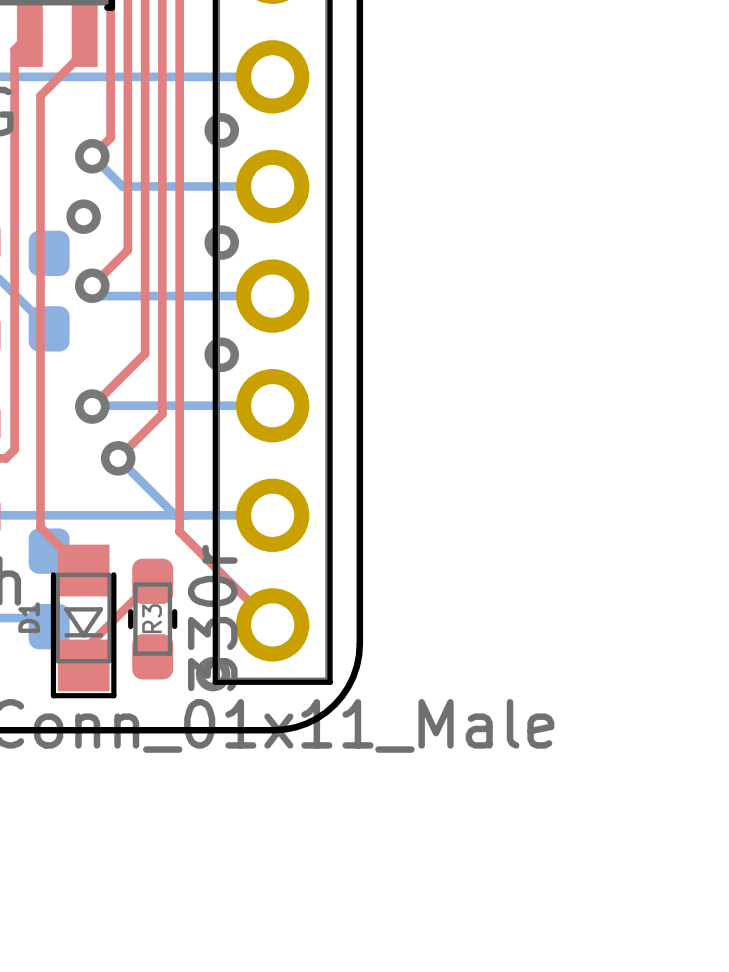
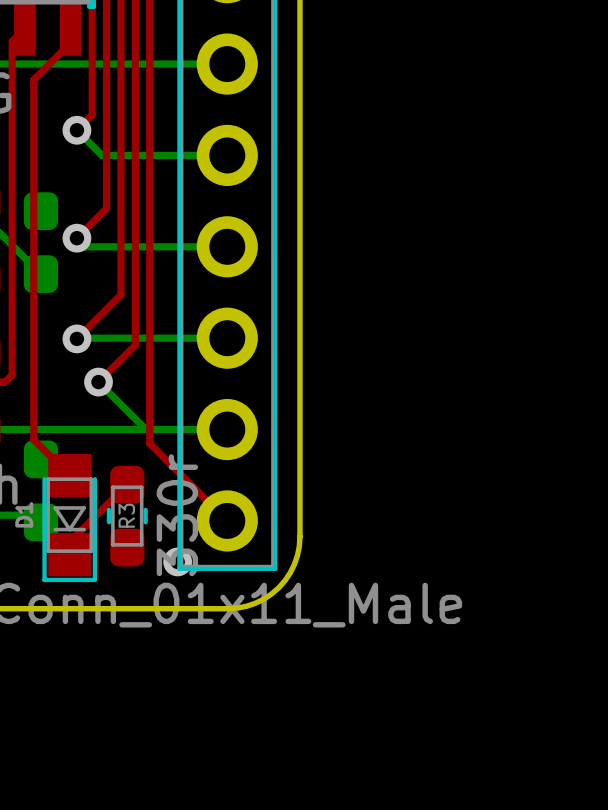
via: (221, 130) -> none
via: (83, 216) -> none
via: (221, 242) -> none
via: (221, 354) -> none

